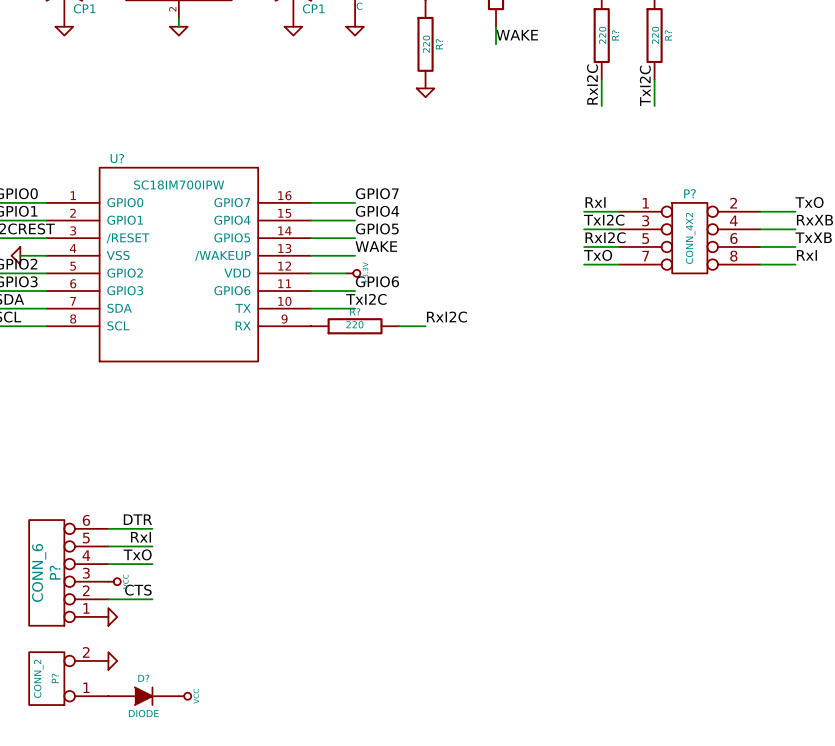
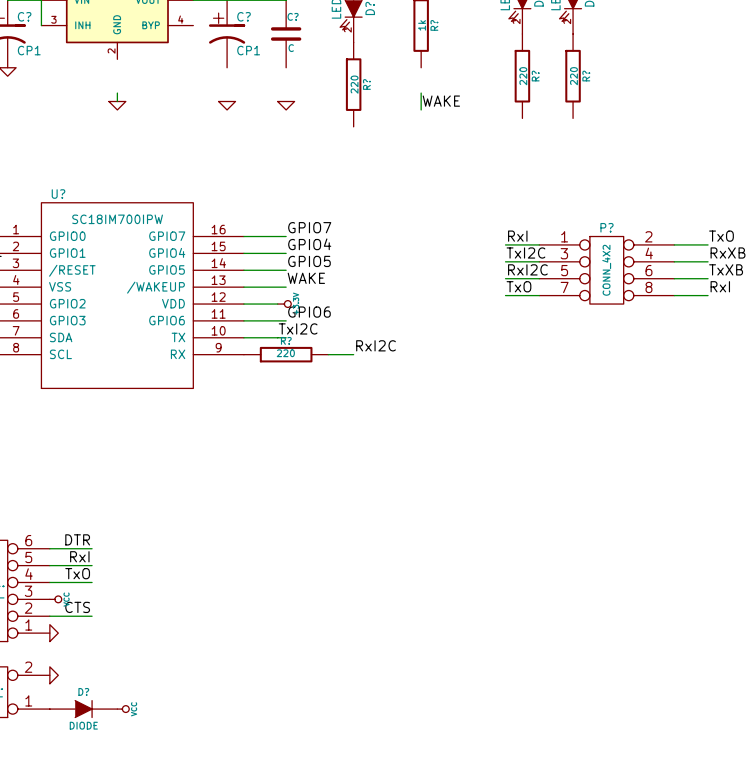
wire: (178, 17) (178, 26) -> (117, 93) (117, 101)
wire: (496, 26) (496, 44) -> (421, 93) (421, 109)
power symbol position: (178, 31) -> (117, 105)
power symbol position: (293, 31) -> (227, 105)
power symbol position: (355, 31) -> (286, 105)
label position: WAKE (517, 35) -> WAKE (441, 101)
wire: (601, 79) (601, 106) -> none
wire: (654, 79) (654, 106) -> none
label: RxI2C (592, 84) -> none
label: TxI2C (645, 85) -> none
power symbol: (425, 92) -> none

